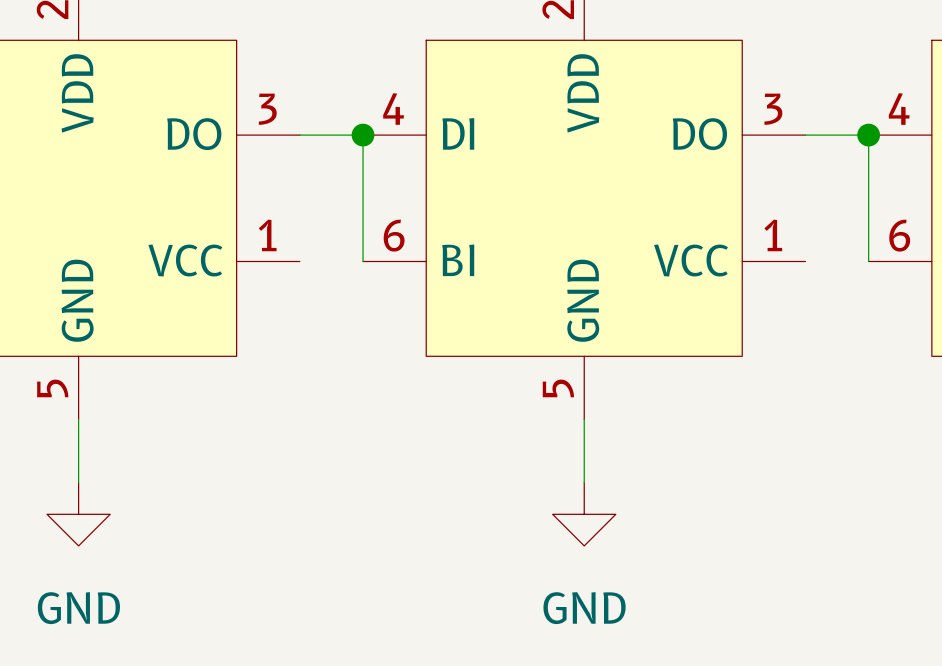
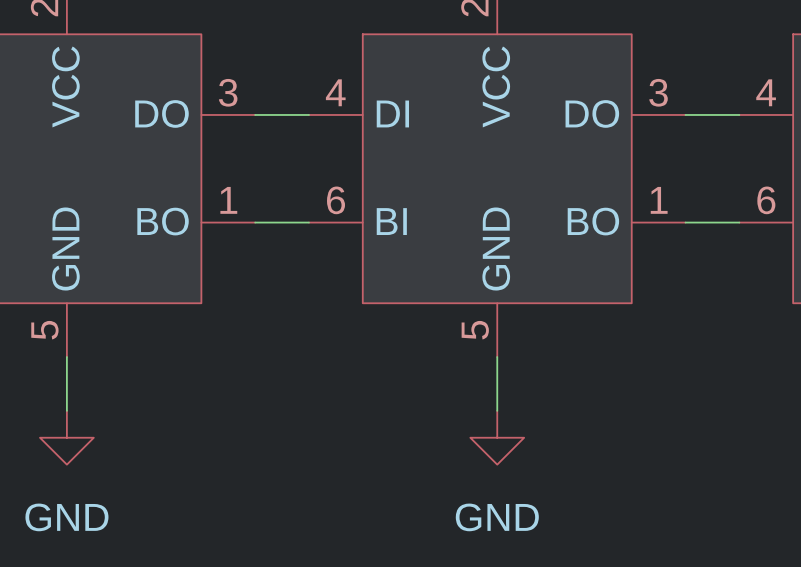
part pin name: VDD (77, 93) -> VCC (65, 86)
part pin name: VDD (583, 93) -> VCC (496, 86)
wire: (363, 135) (363, 261) -> (255, 222) (308, 222)
junction: (363, 135) -> none
wire: (868, 135) (868, 261) -> (685, 222) (739, 222)
junction: (868, 135) -> none
part pin name: VCC (185, 260) -> BO (163, 221)
part pin name: VCC (691, 260) -> BO (593, 221)

